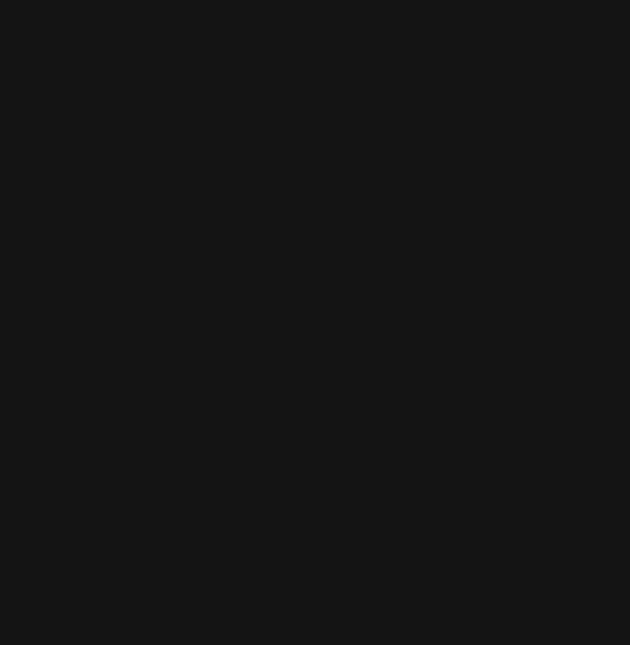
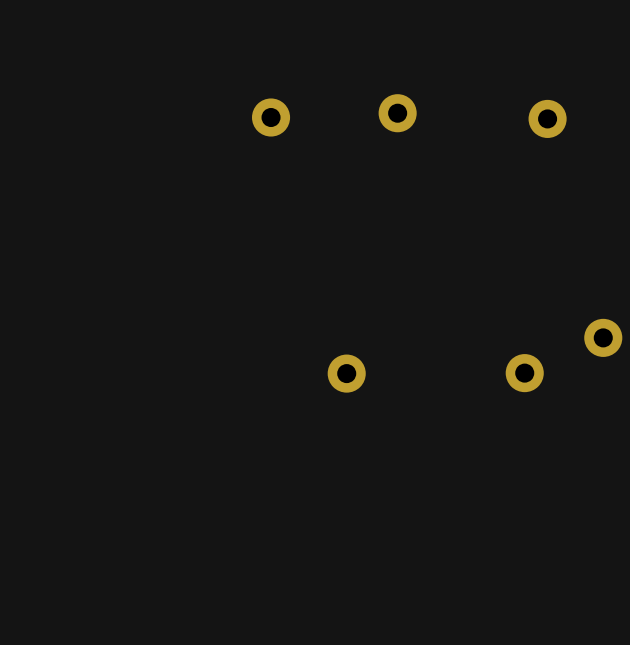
via: none -> (397, 113)
via: none -> (271, 117)
via: none -> (547, 118)
via: none -> (603, 337)
via: none -> (346, 373)
via: none -> (524, 373)

